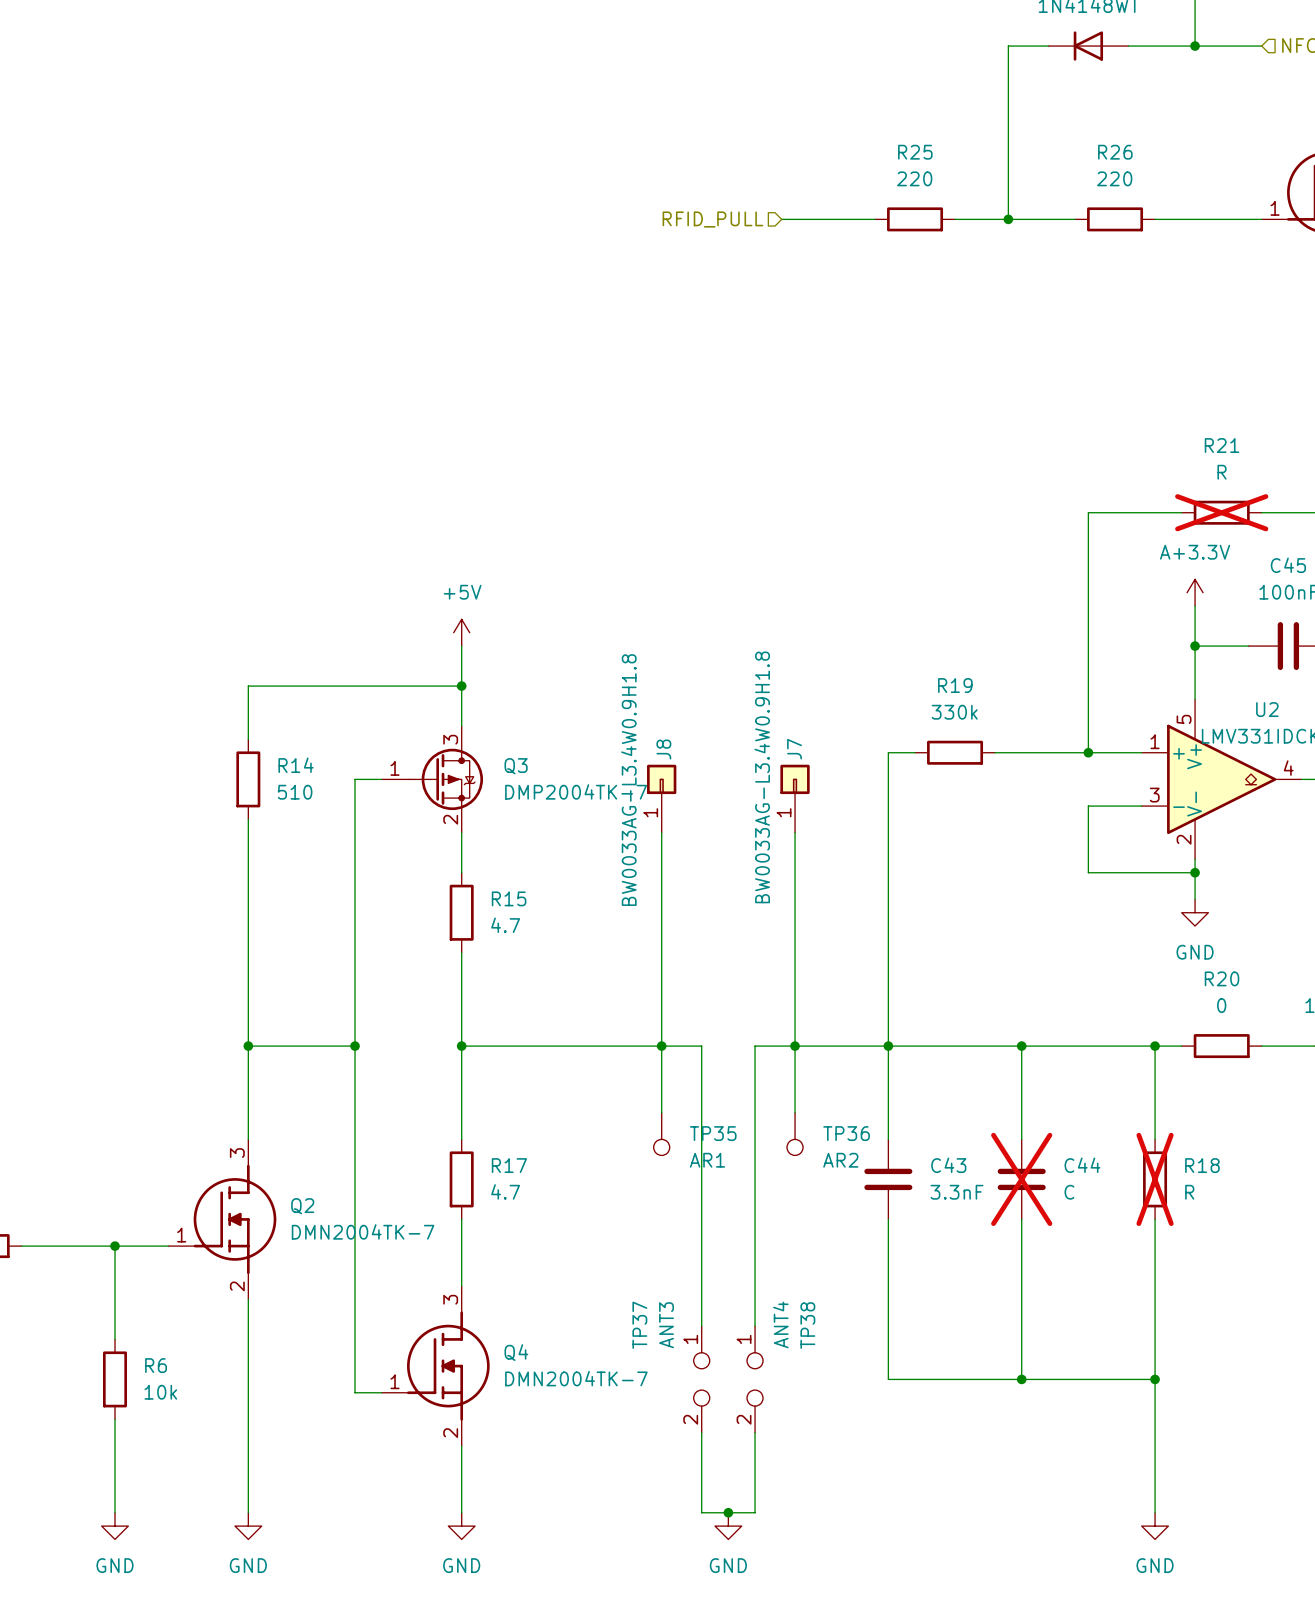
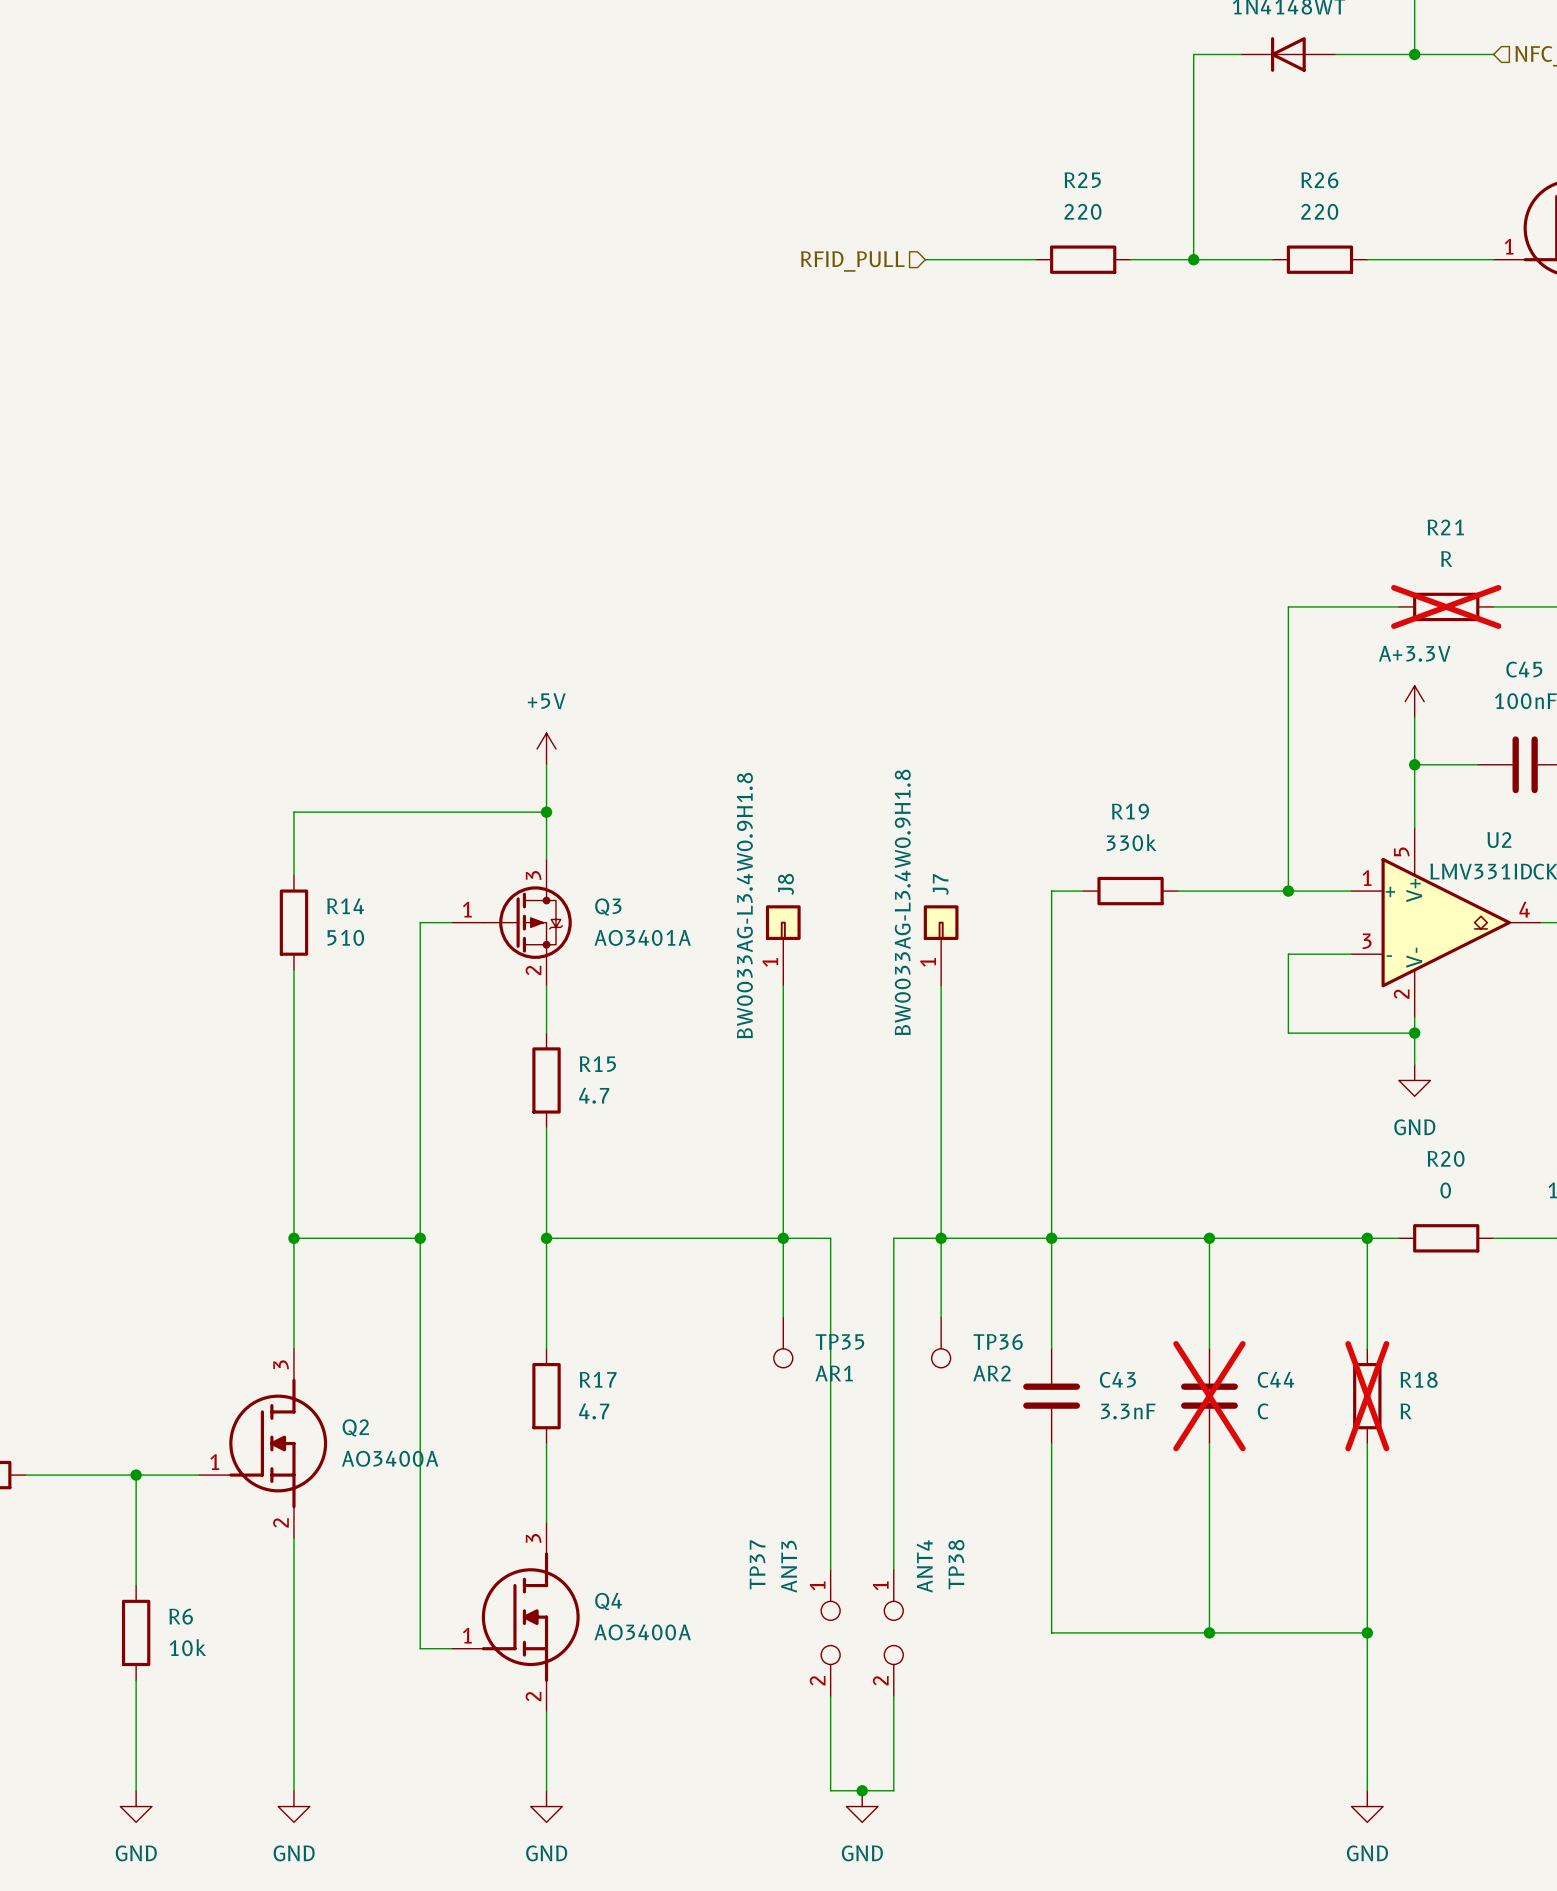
Q3 value: DMP2004TK-7 (576, 791) -> AO3401A (642, 937)
Q2 value: DMN2004TK-7 (363, 1231) -> AO3400A (390, 1458)
Q4 value: DMN2004TK-7 (576, 1378) -> AO3400A (642, 1632)

